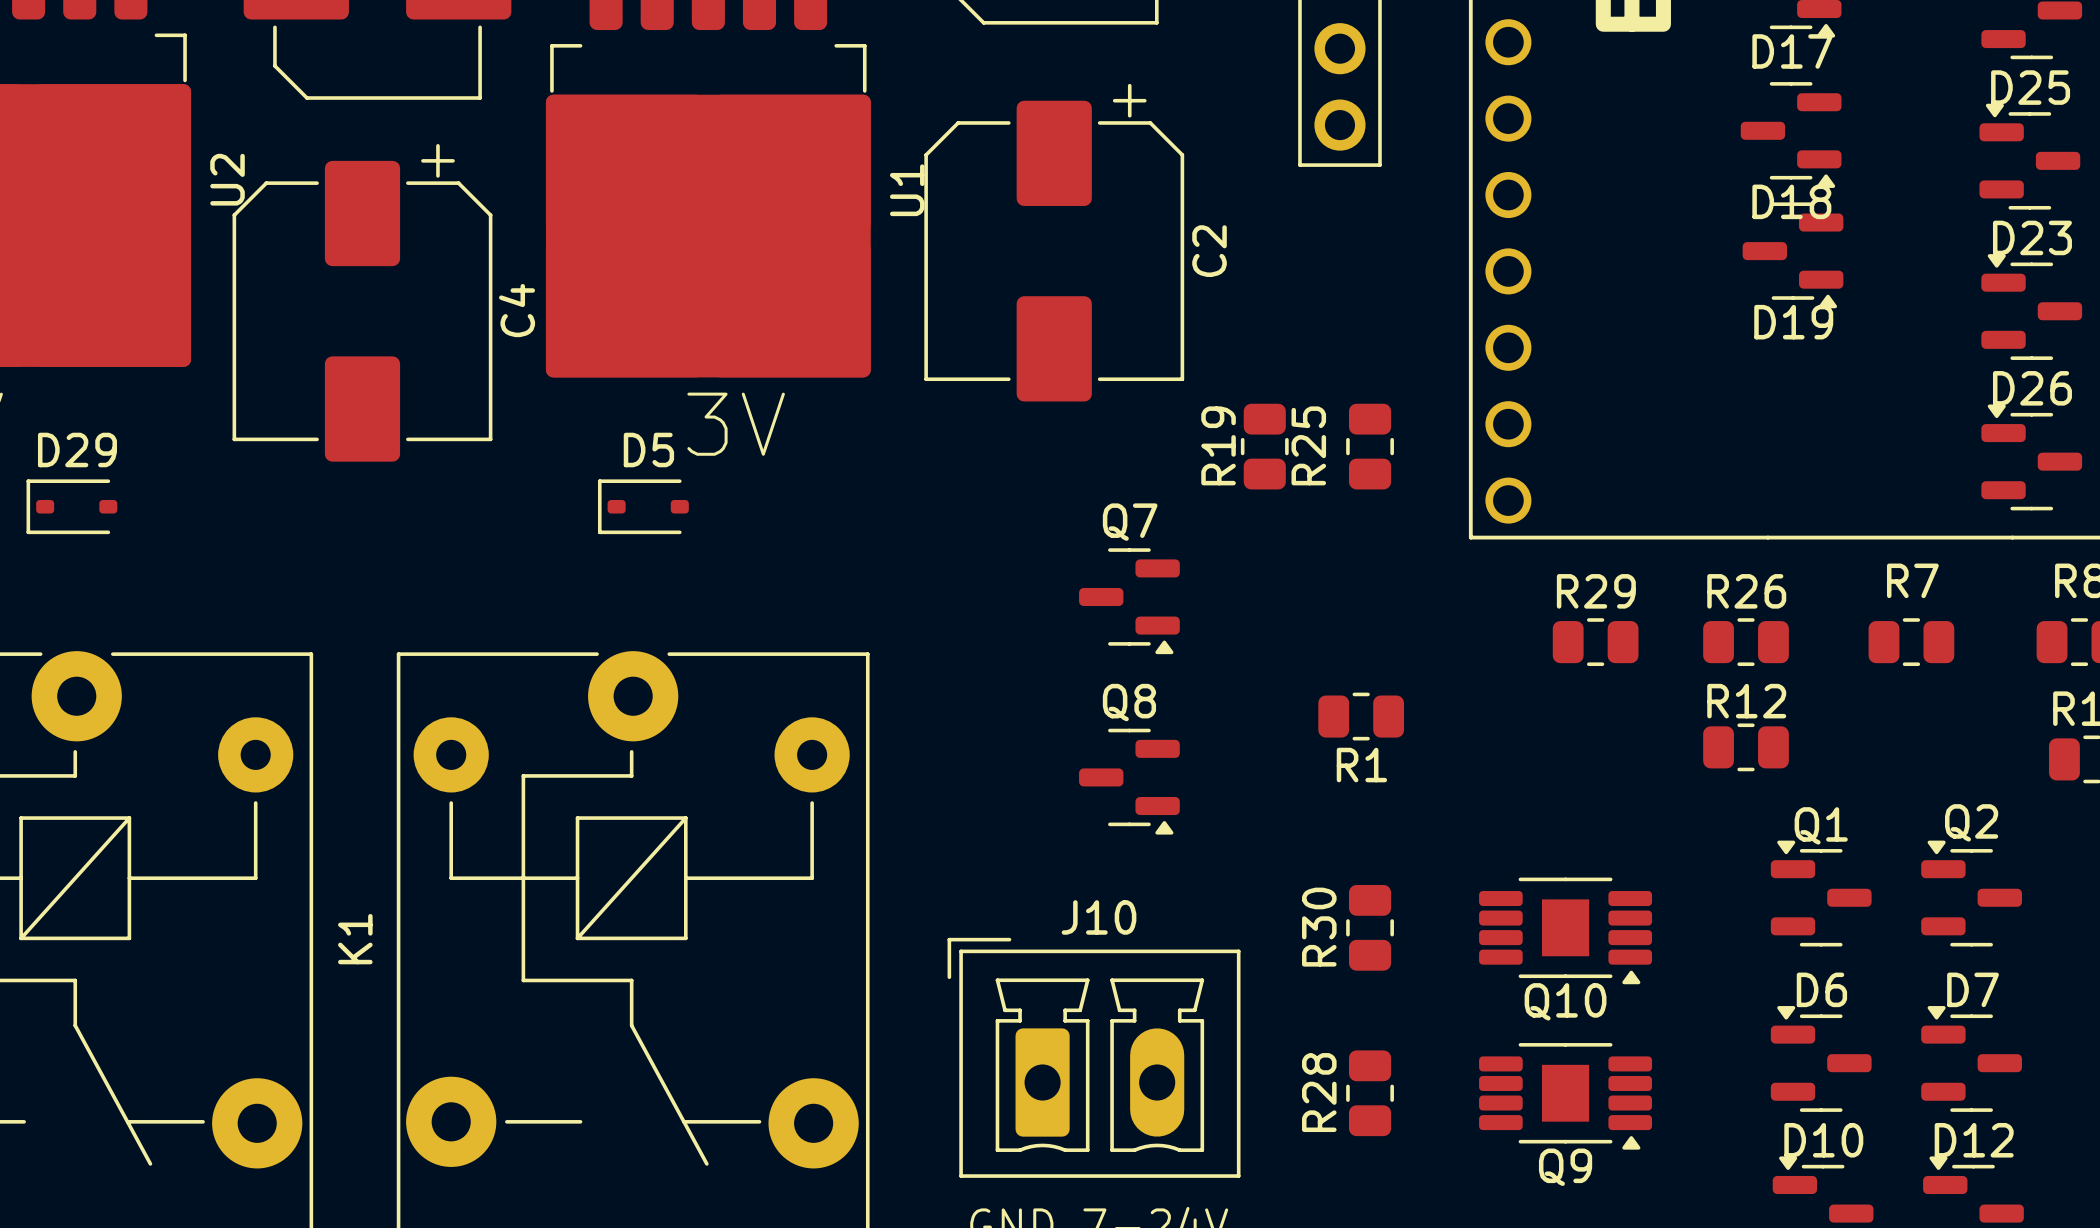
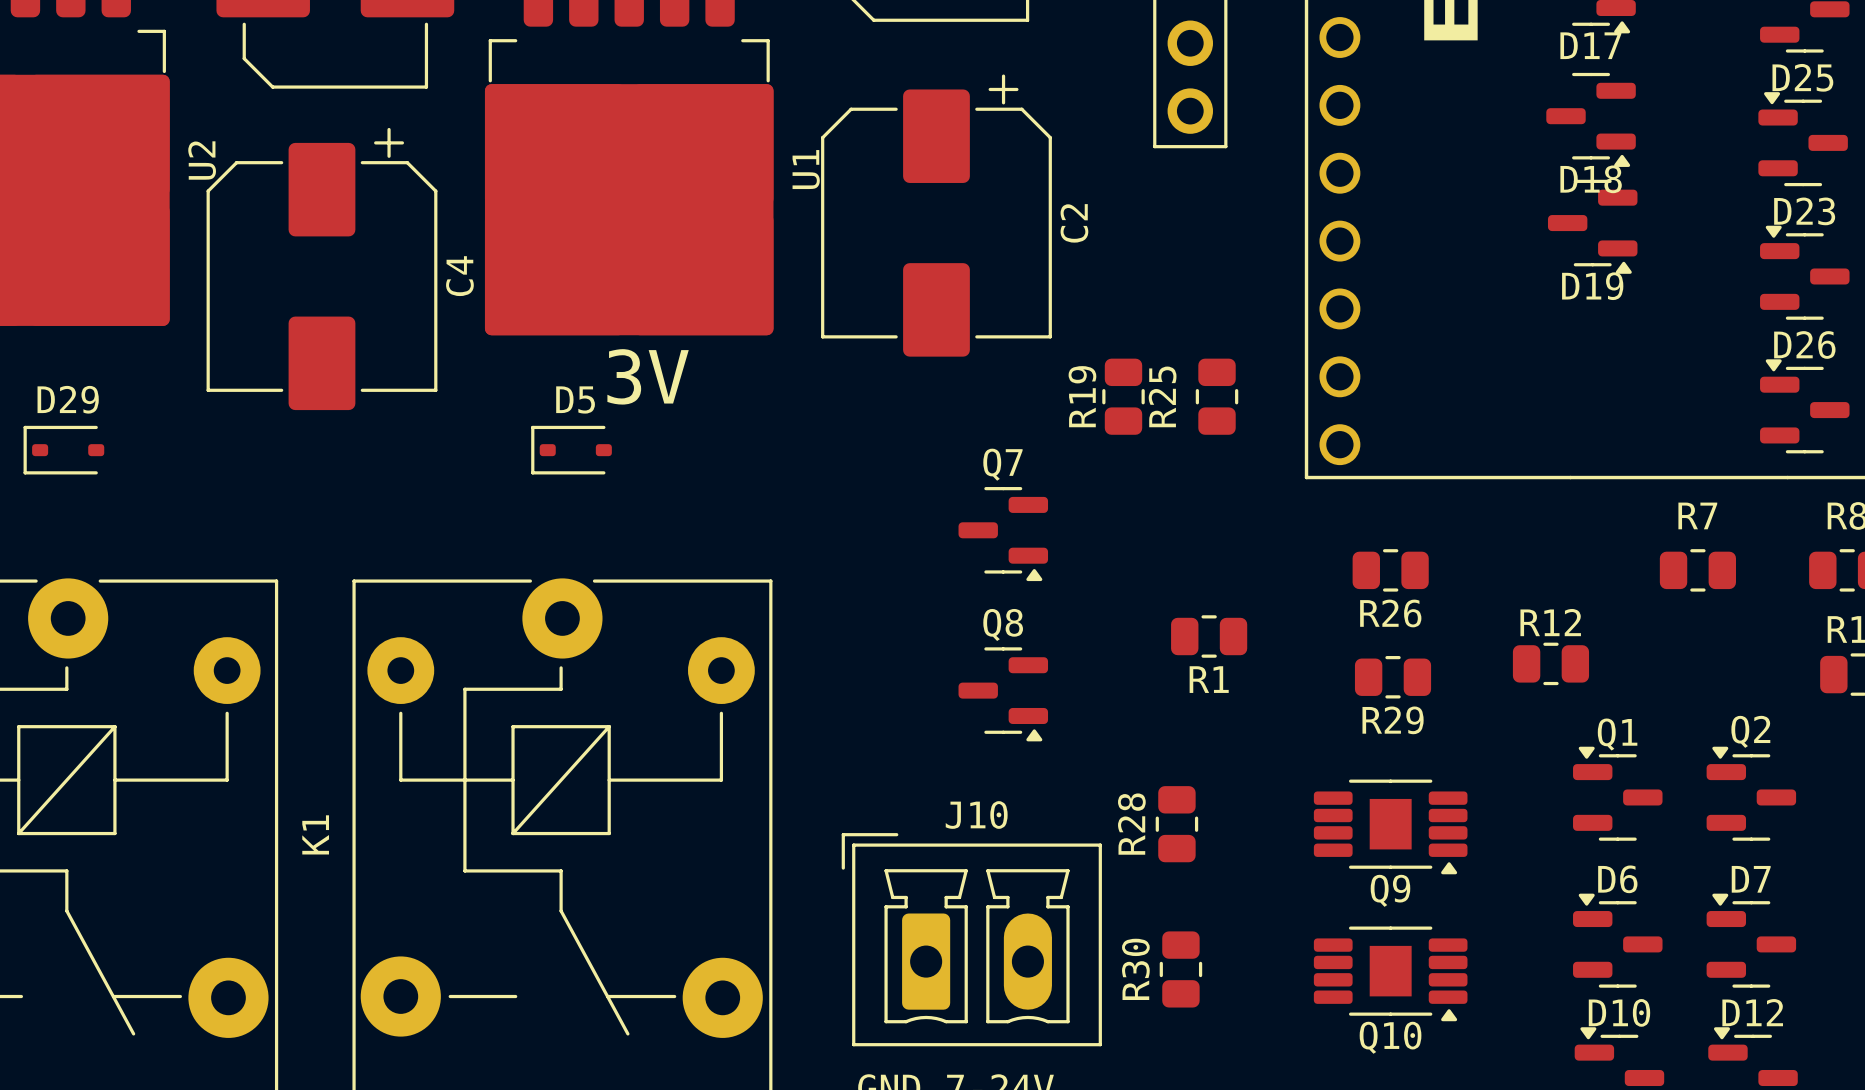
R29 name position: R29 (1596, 591) -> R29 (1393, 720)
R26 name position: R26 (1746, 591) -> R26 (1390, 613)
R29 position: (1595, 642) -> (1393, 677)
R26 position: (1746, 642) -> (1390, 570)
R30 position: (1370, 927) -> (1180, 969)
Q10 name: Q10 (1565, 1001) -> Q9 (1390, 890)
R28 position: (1370, 1093) -> (1176, 824)
Q9 name: Q9 (1565, 1167) -> Q10 (1390, 1037)

